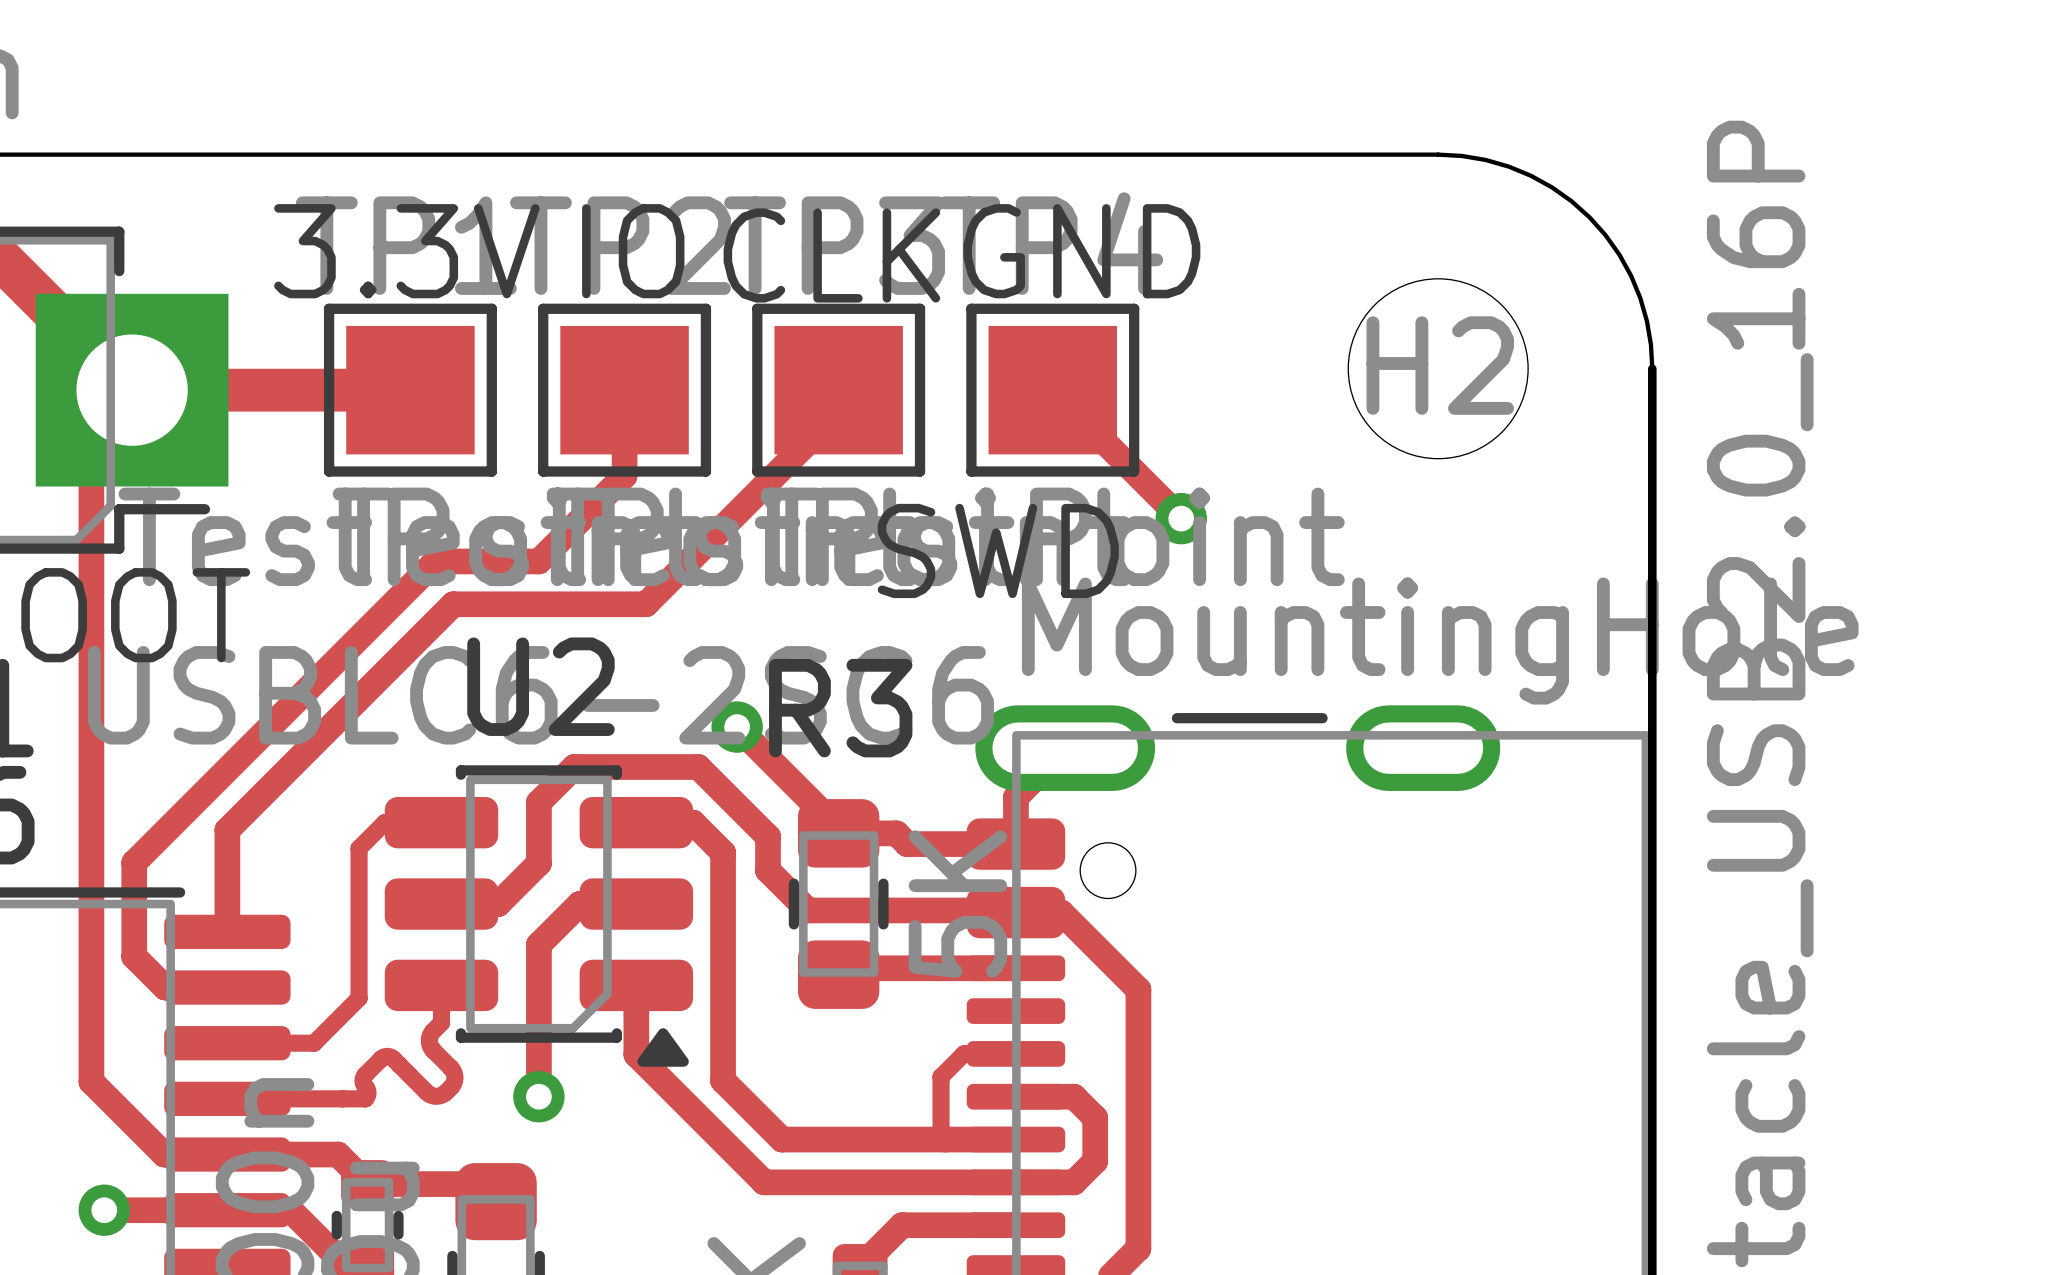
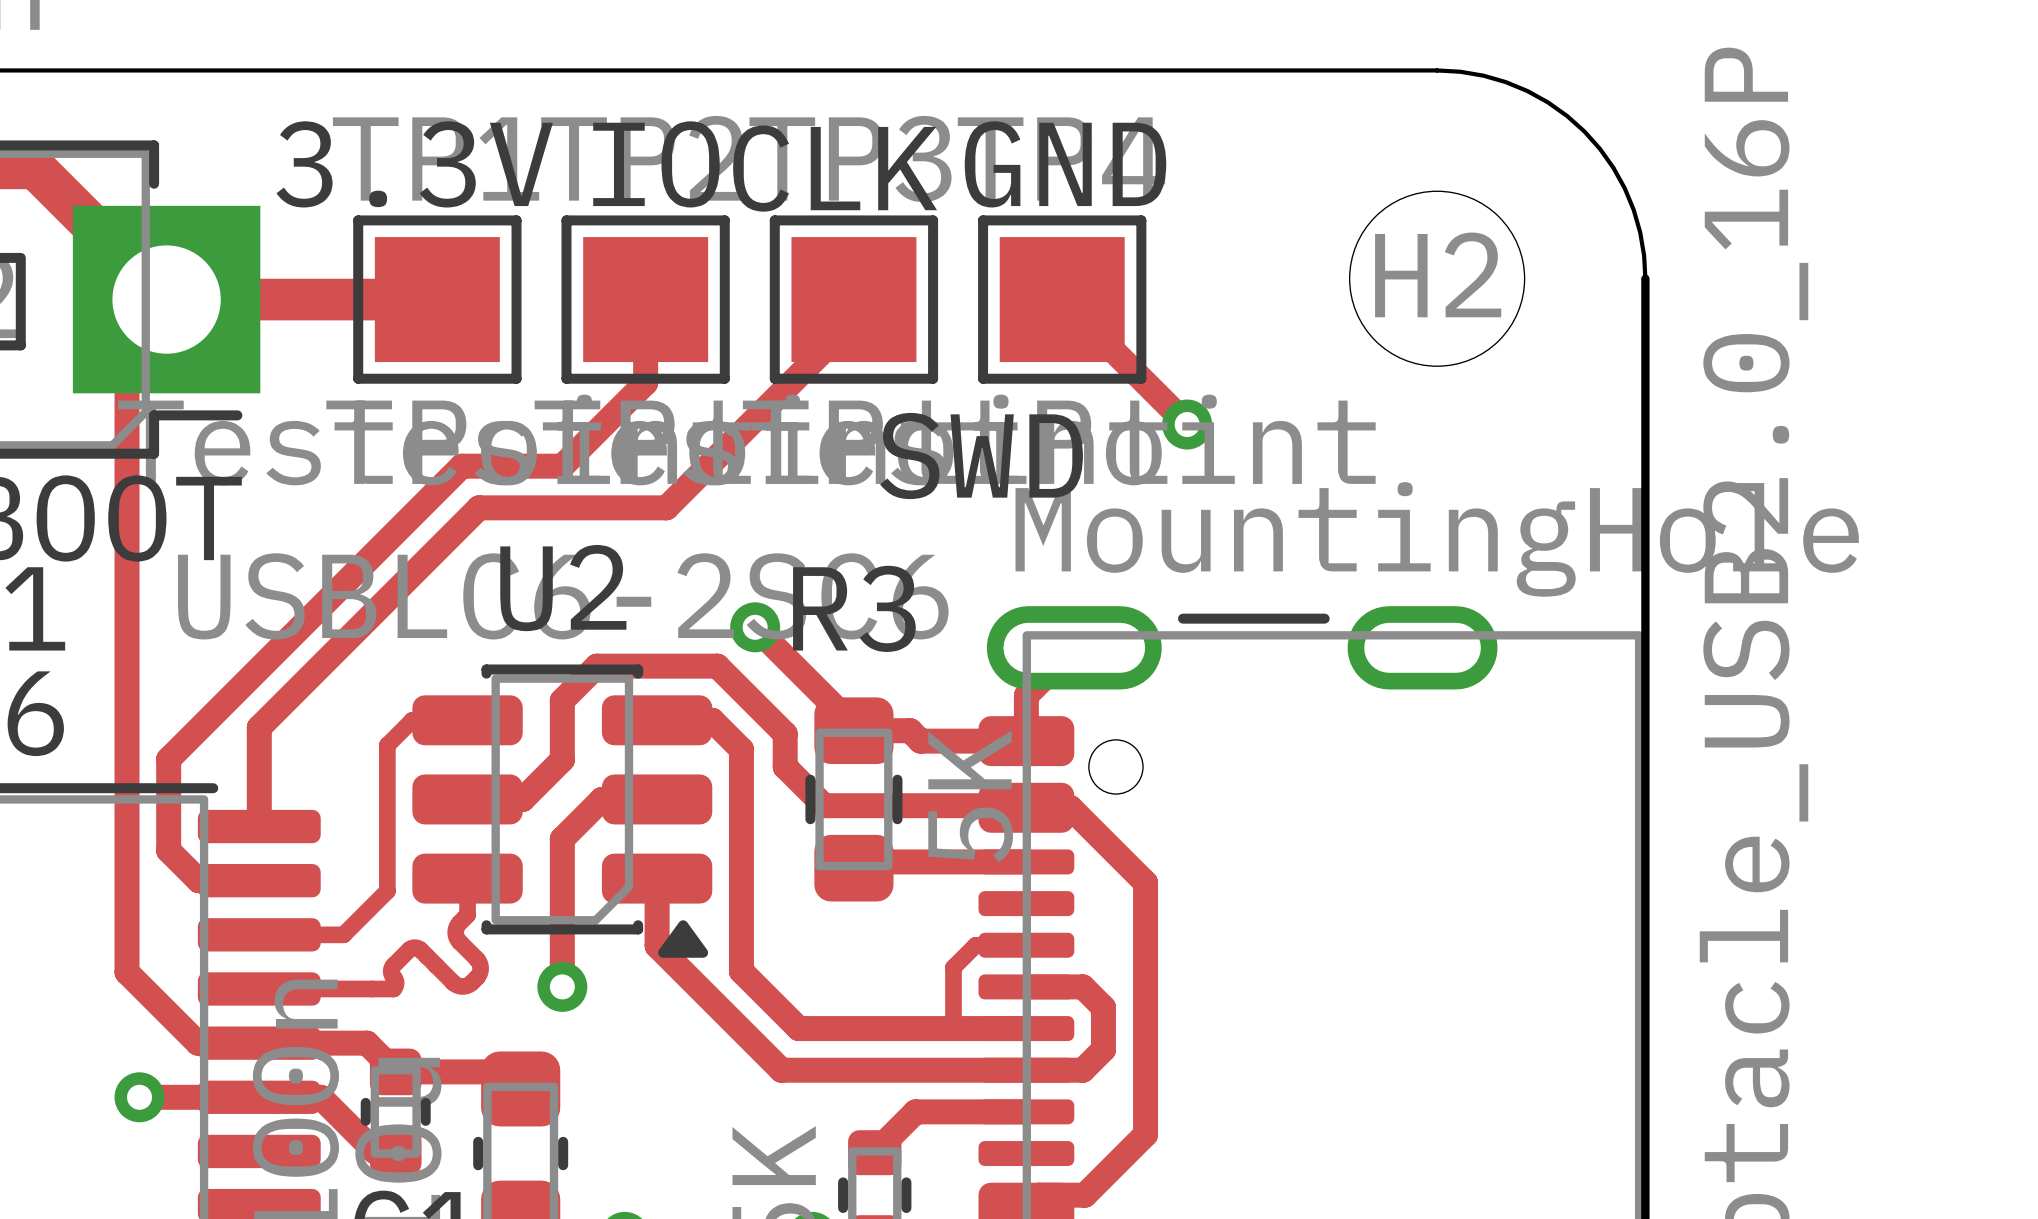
text position: 3.3V (406, 251) -> 3.3V (414, 164)

